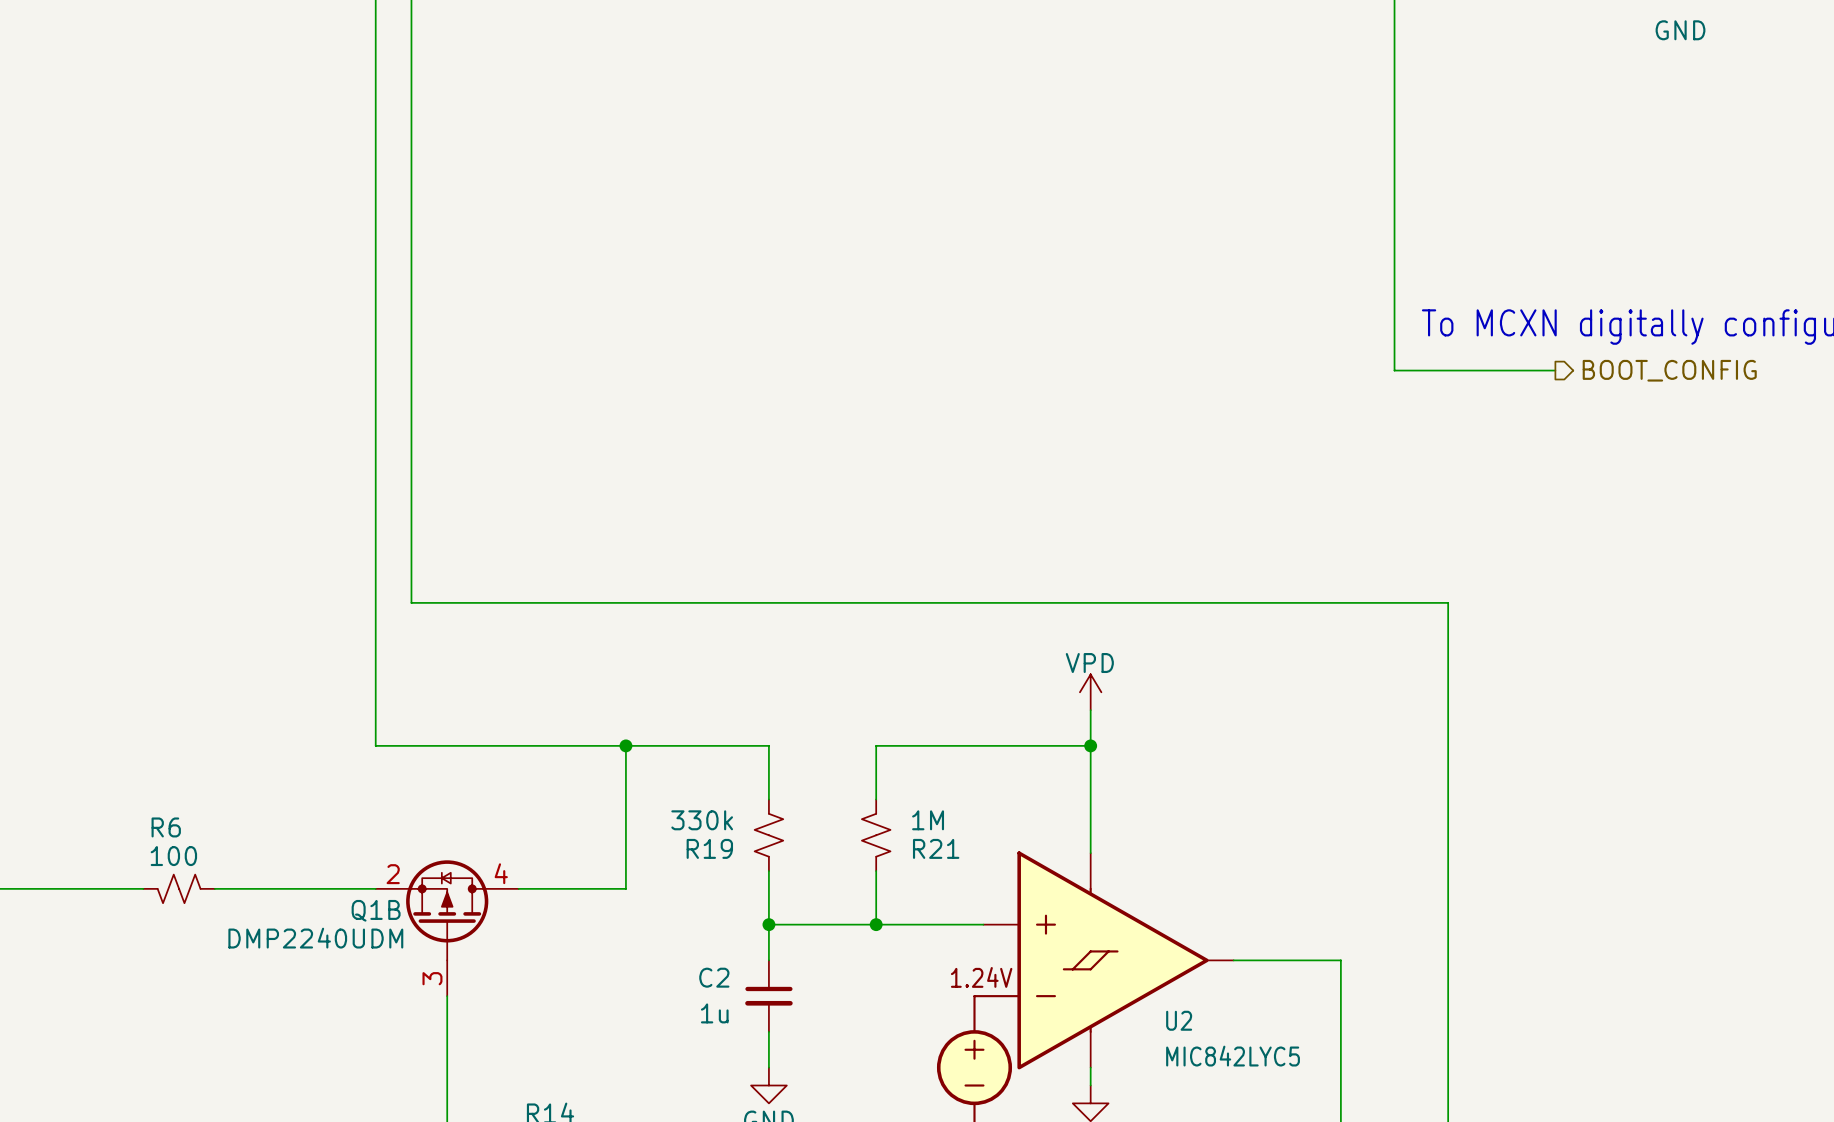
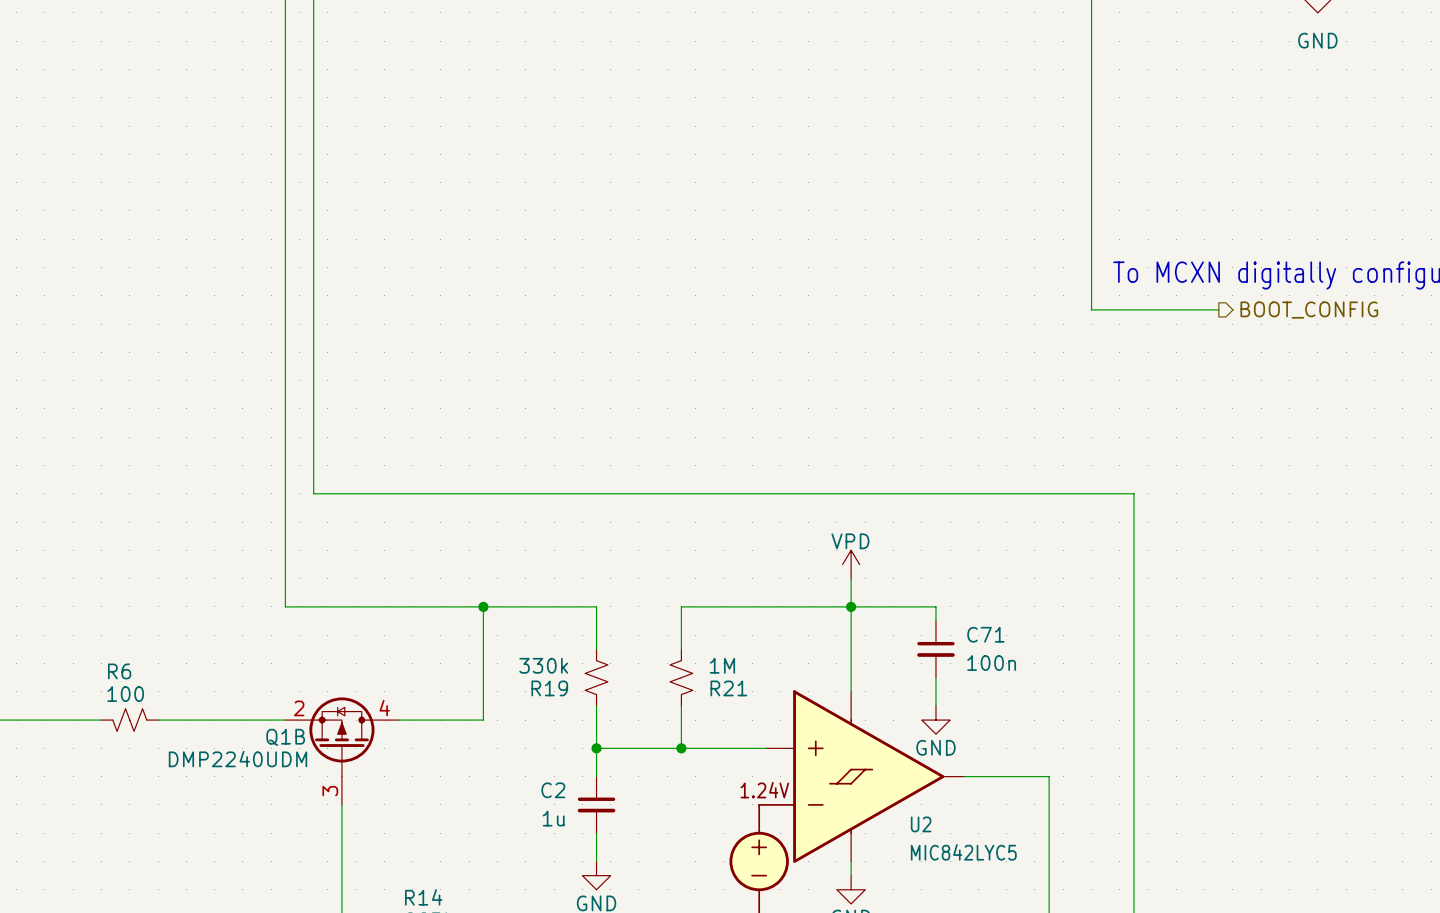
wire: none -> (851, 606) (935, 606) (935, 621)
C71: none -> 100n (935, 649)
wire: none -> (935, 677) (935, 705)
power symbol: none -> GND (935, 720)

